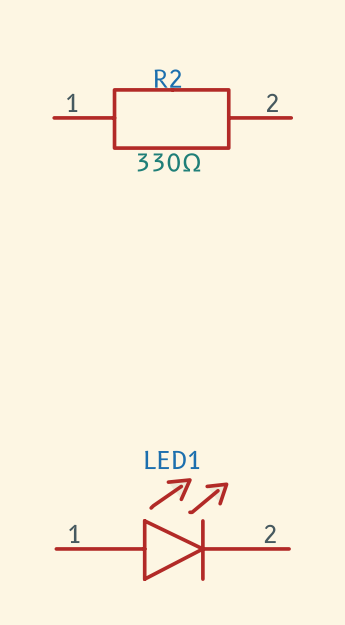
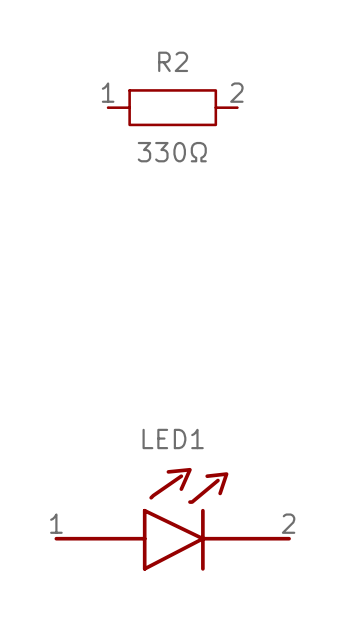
R2 symbol: [52, 88, 294, 150] -> [106, 89, 239, 127]
LED1 symbol: [54, 478, 291, 581] -> [54, 467, 291, 571]

